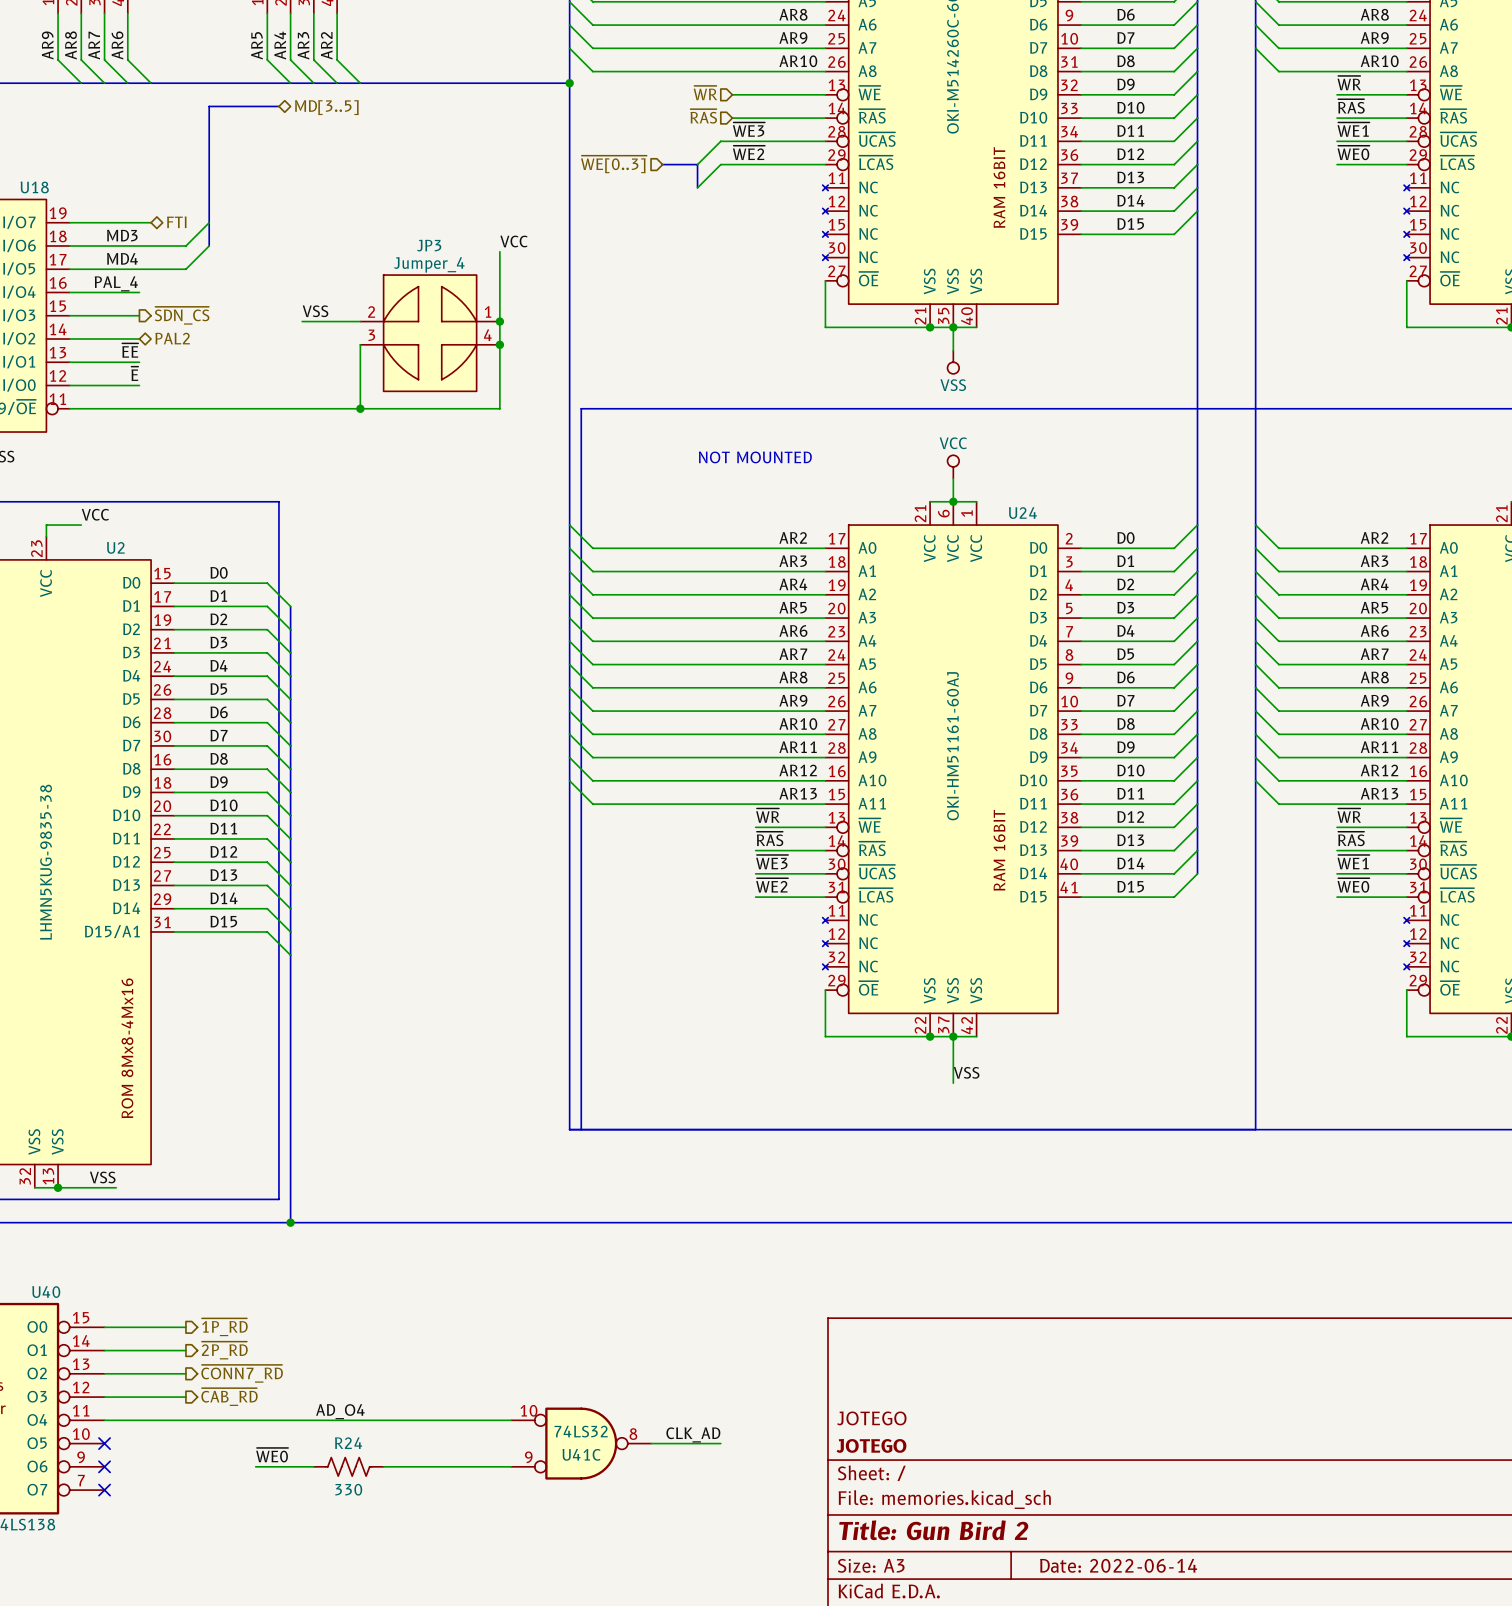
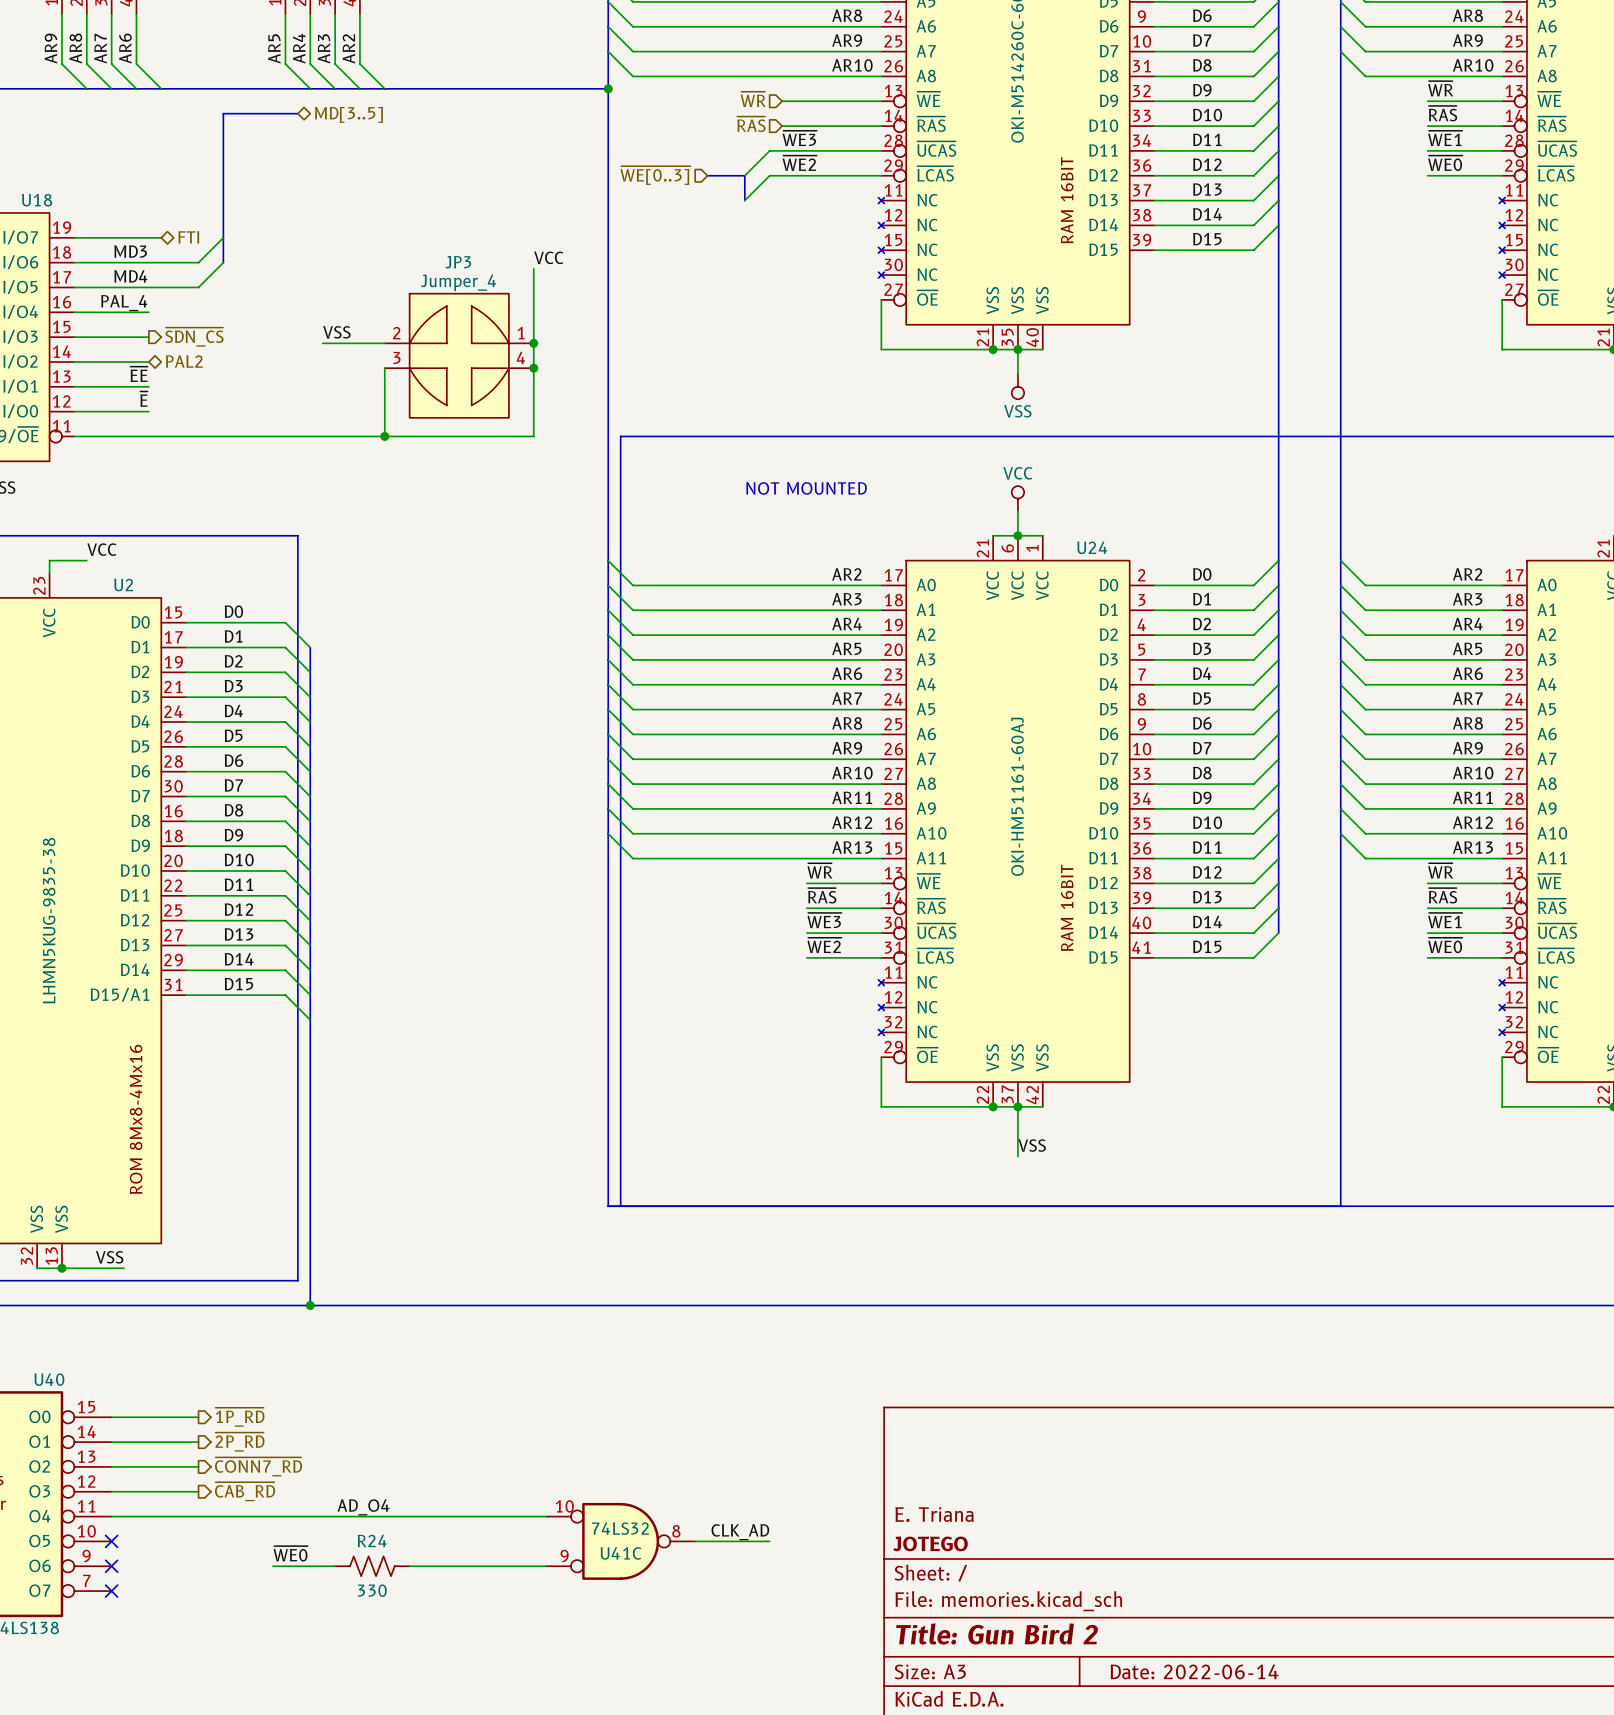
title block: JOTEGO (871, 1418) -> E. Triana (934, 1514)

